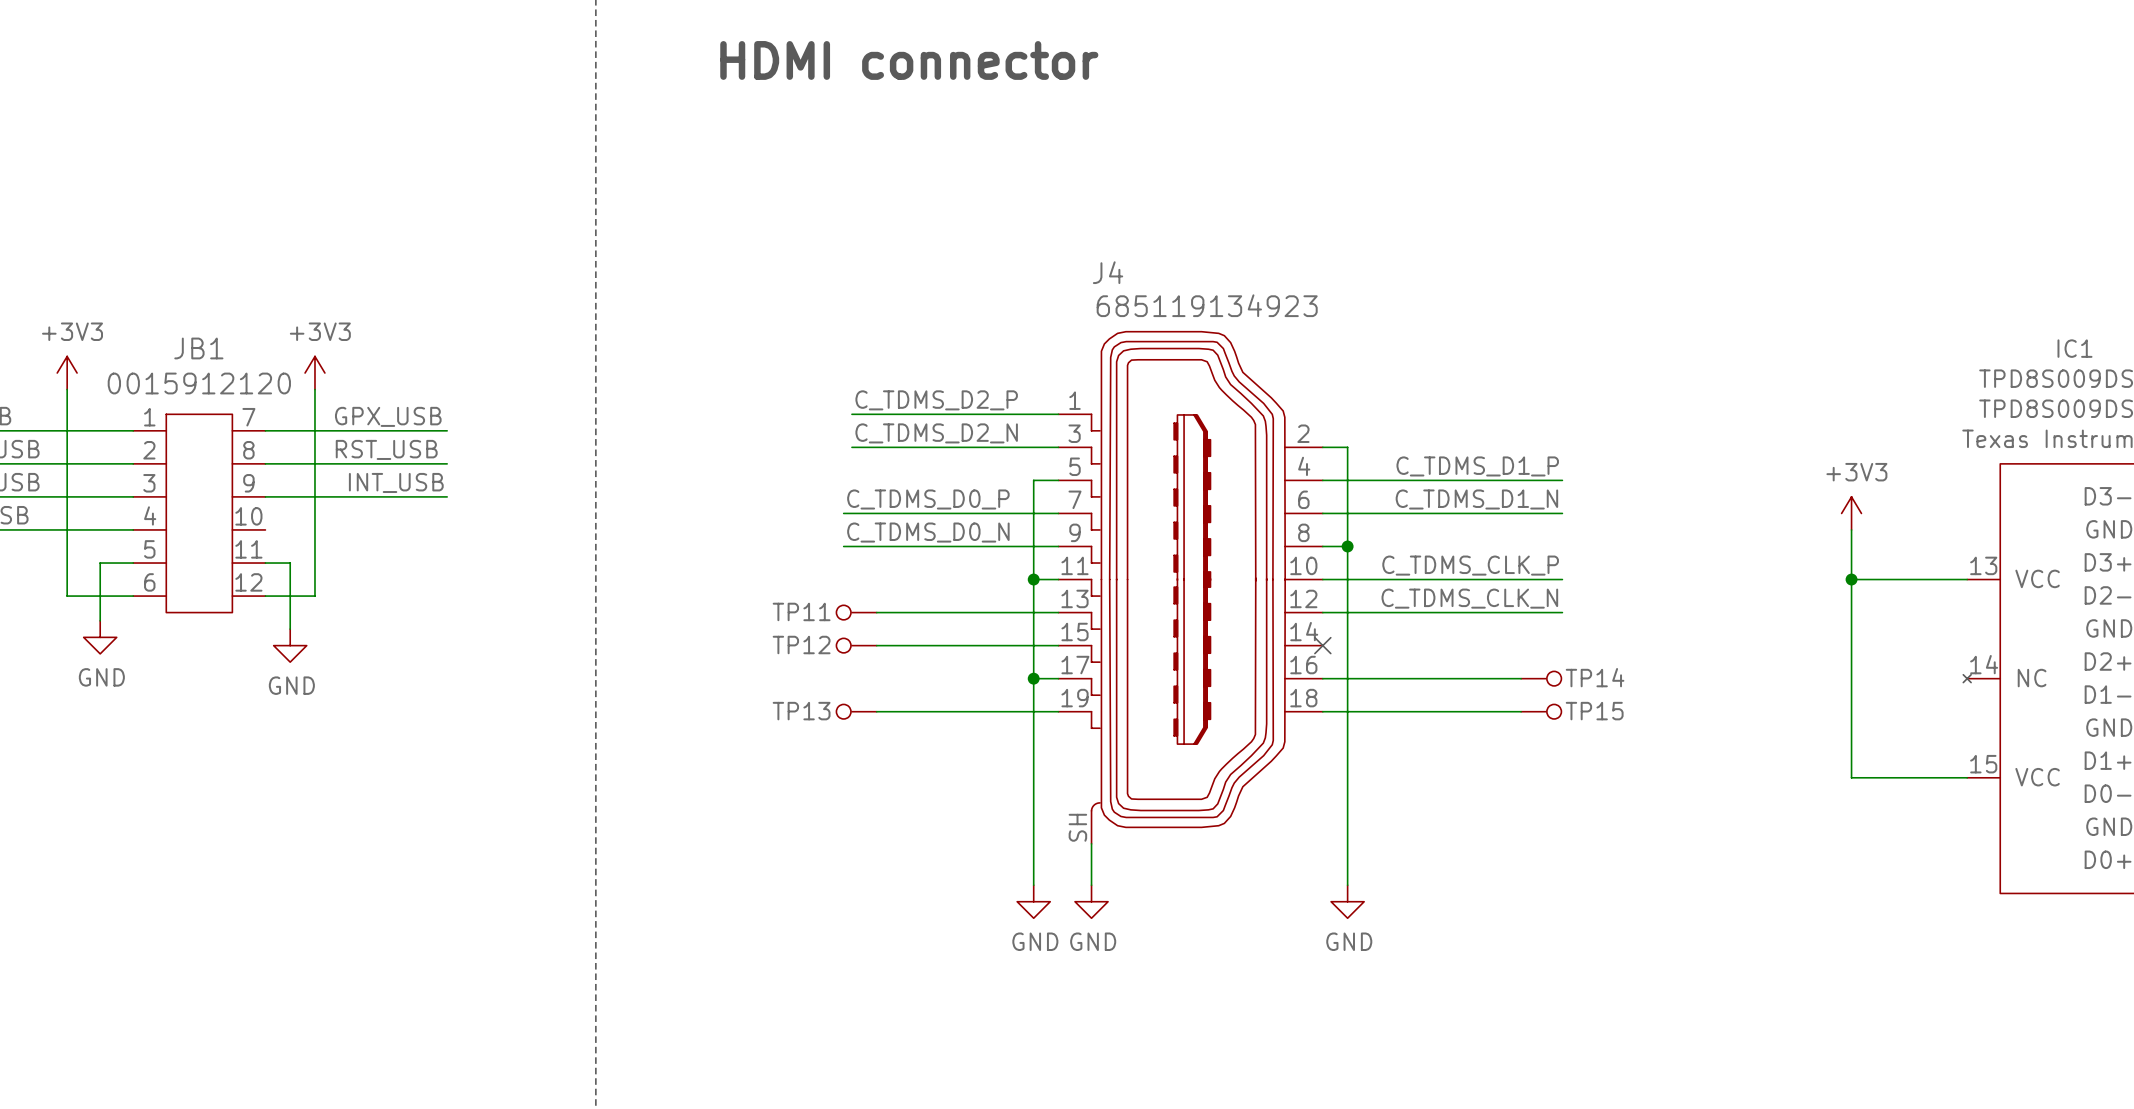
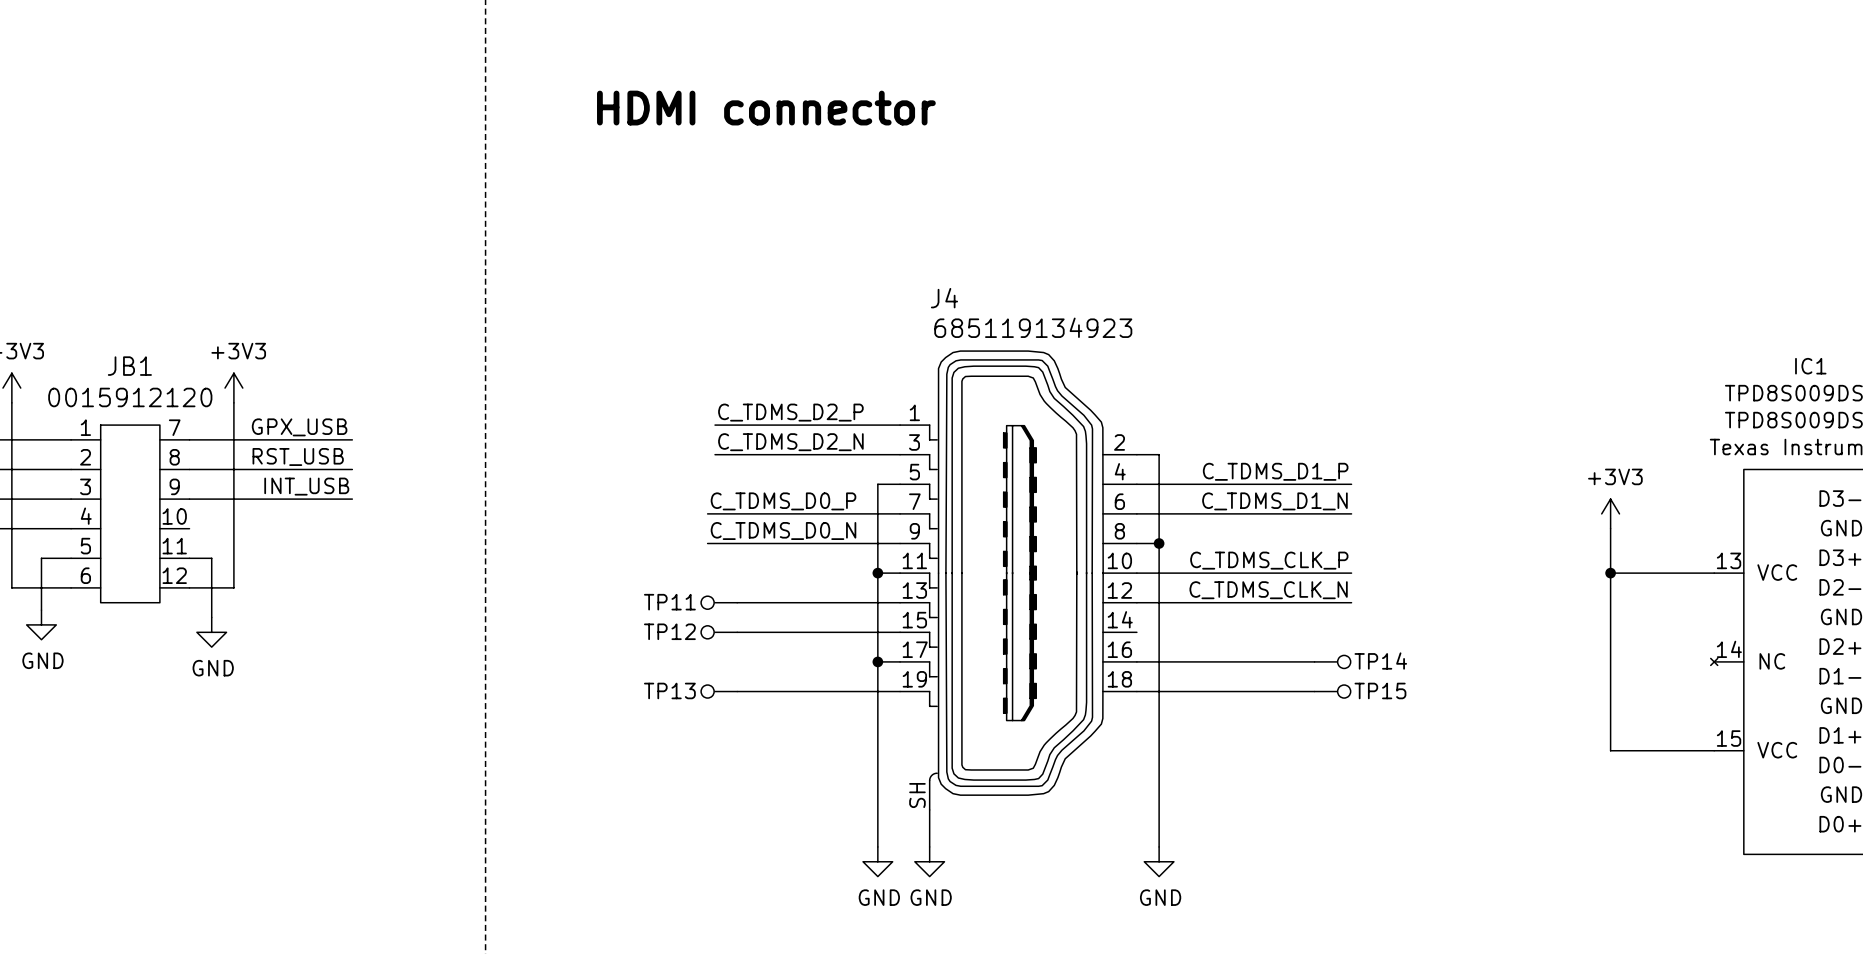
no-connect mark: (1322, 645) -> none

